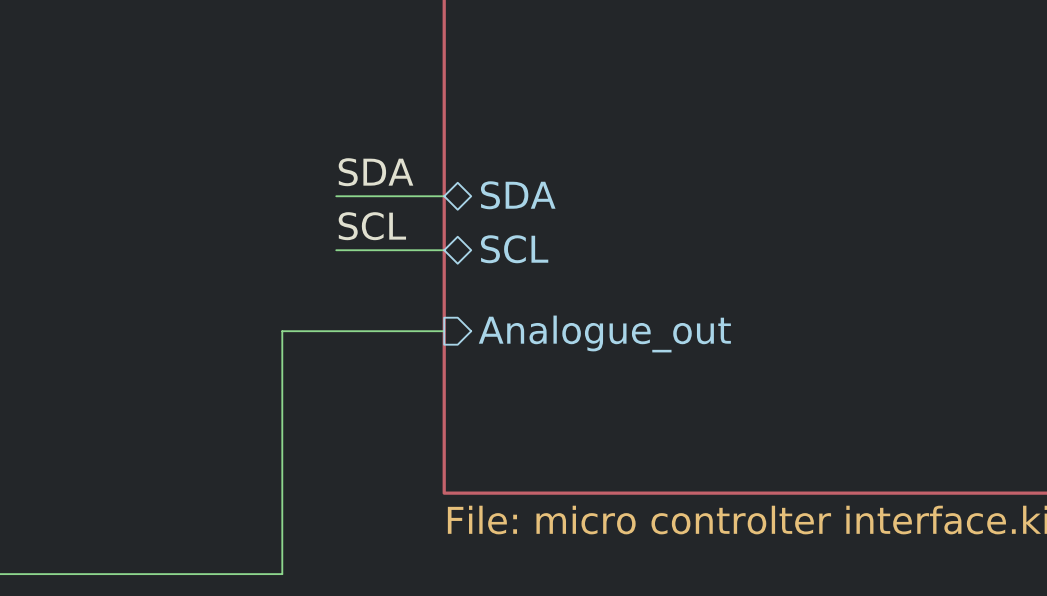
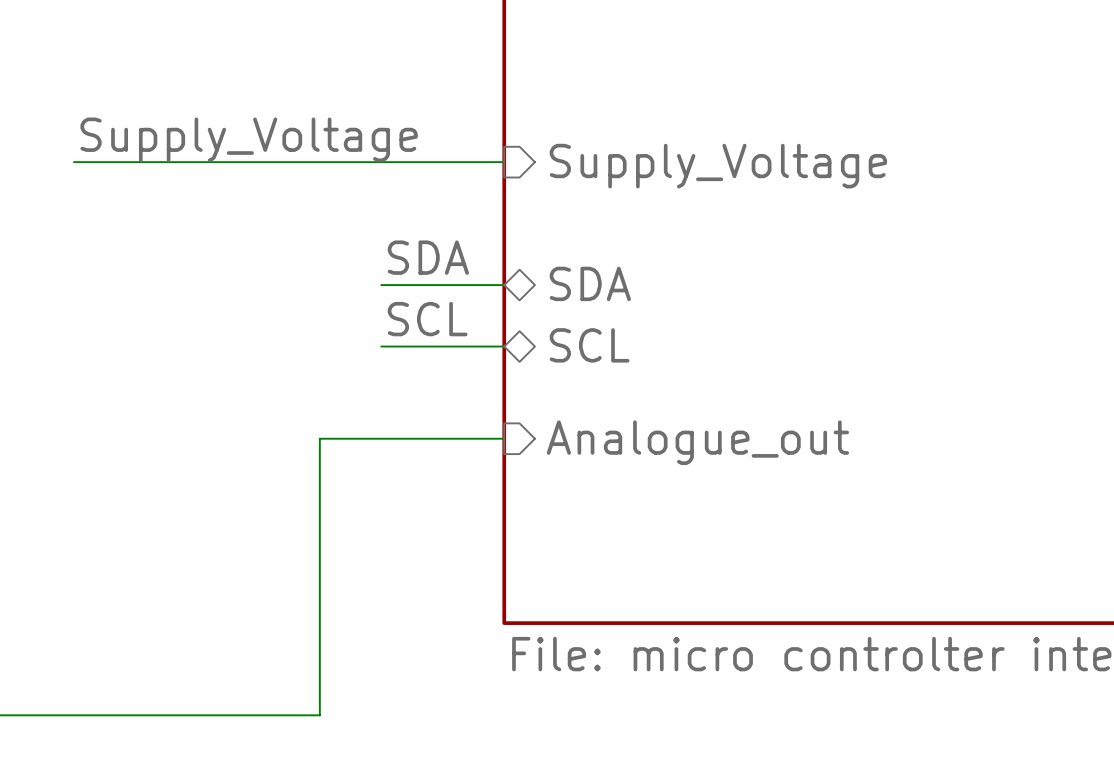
label: none -> Supply_Voltage (249, 139)
wire: none -> (73, 162) (504, 162)
sheet pin: none -> Supply_Voltage (718, 166)

